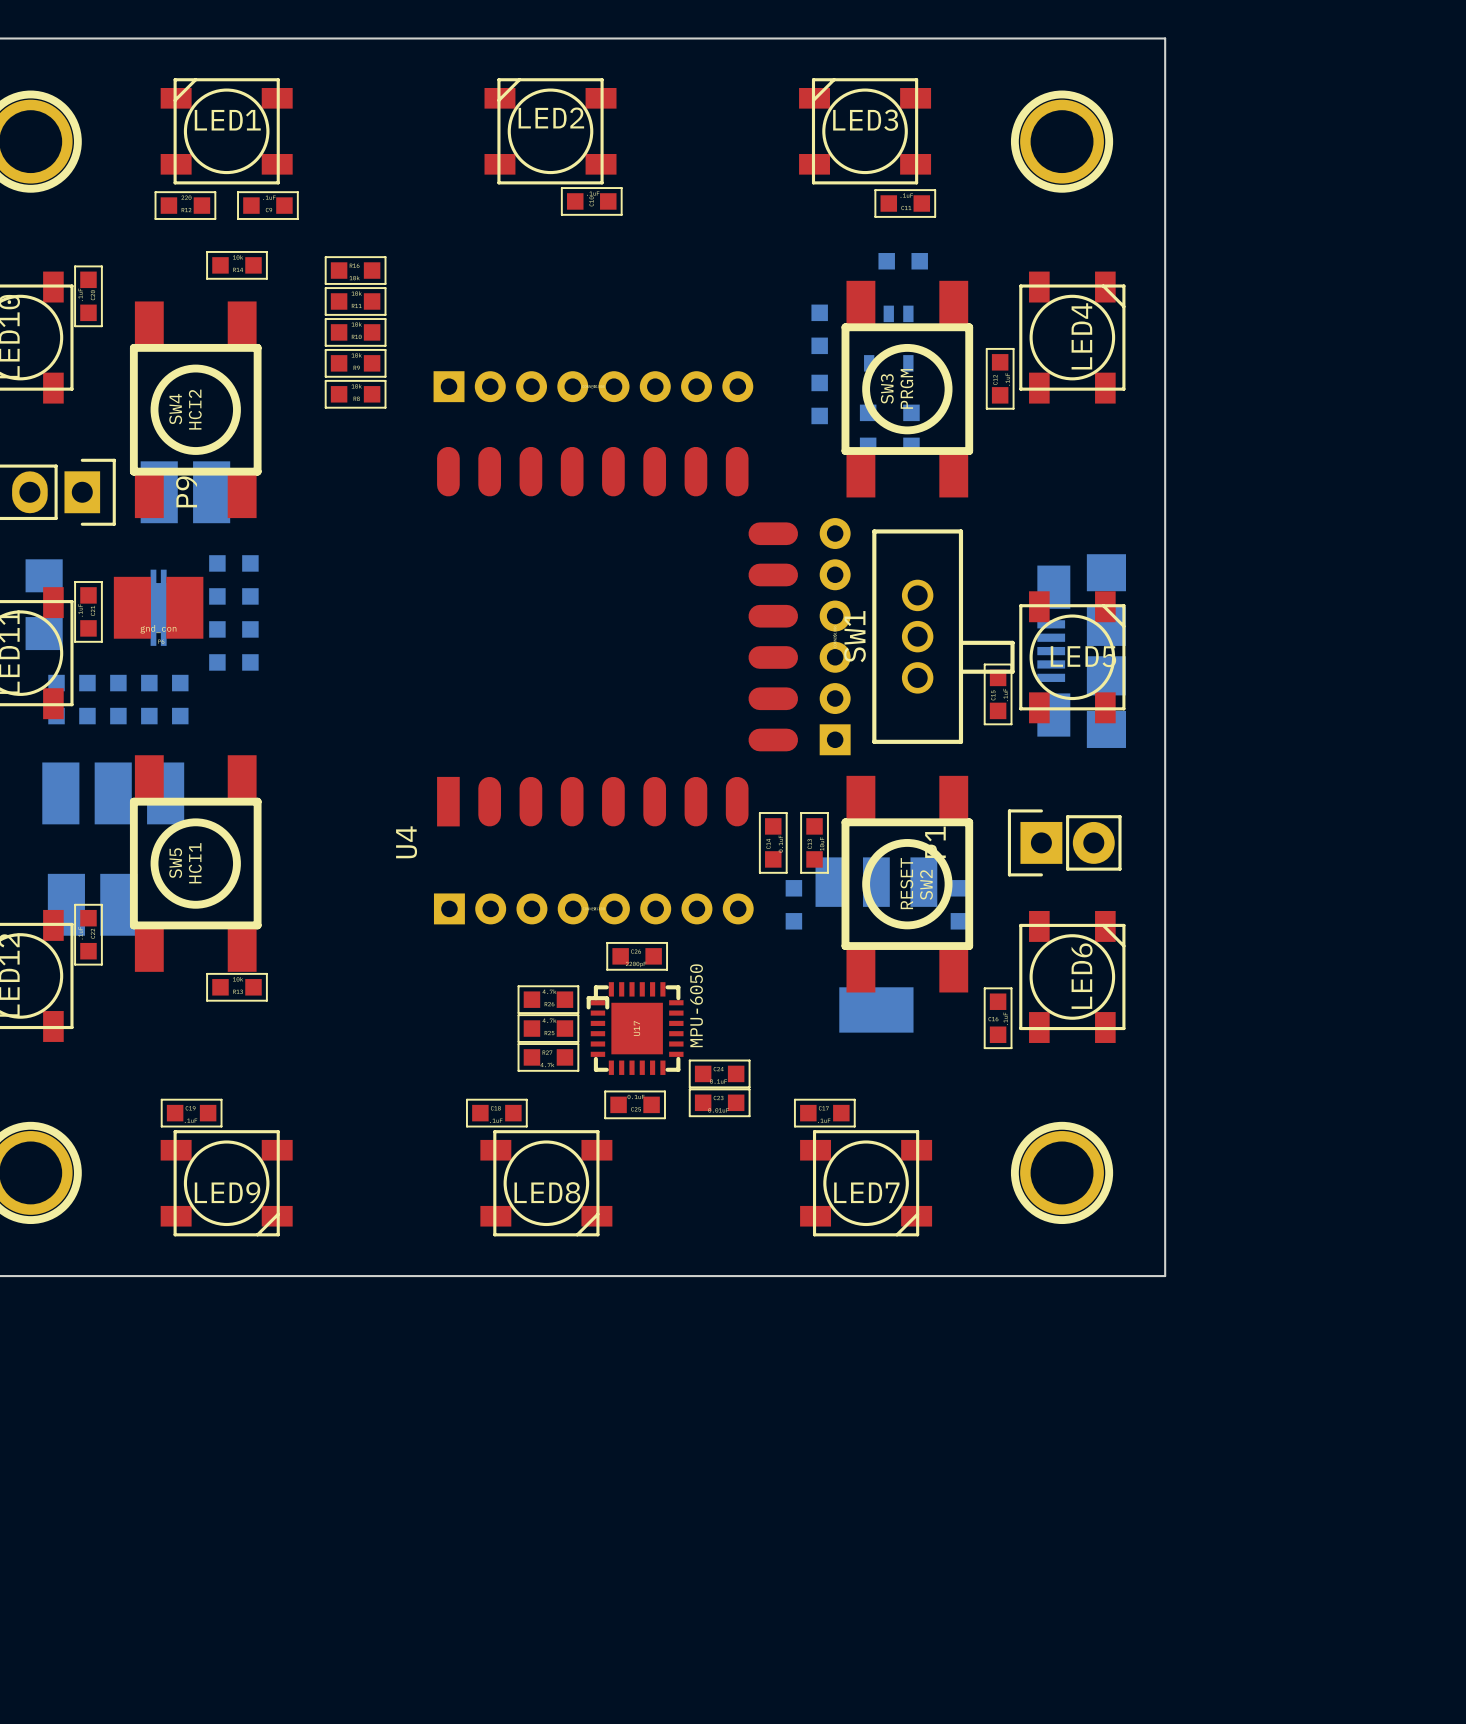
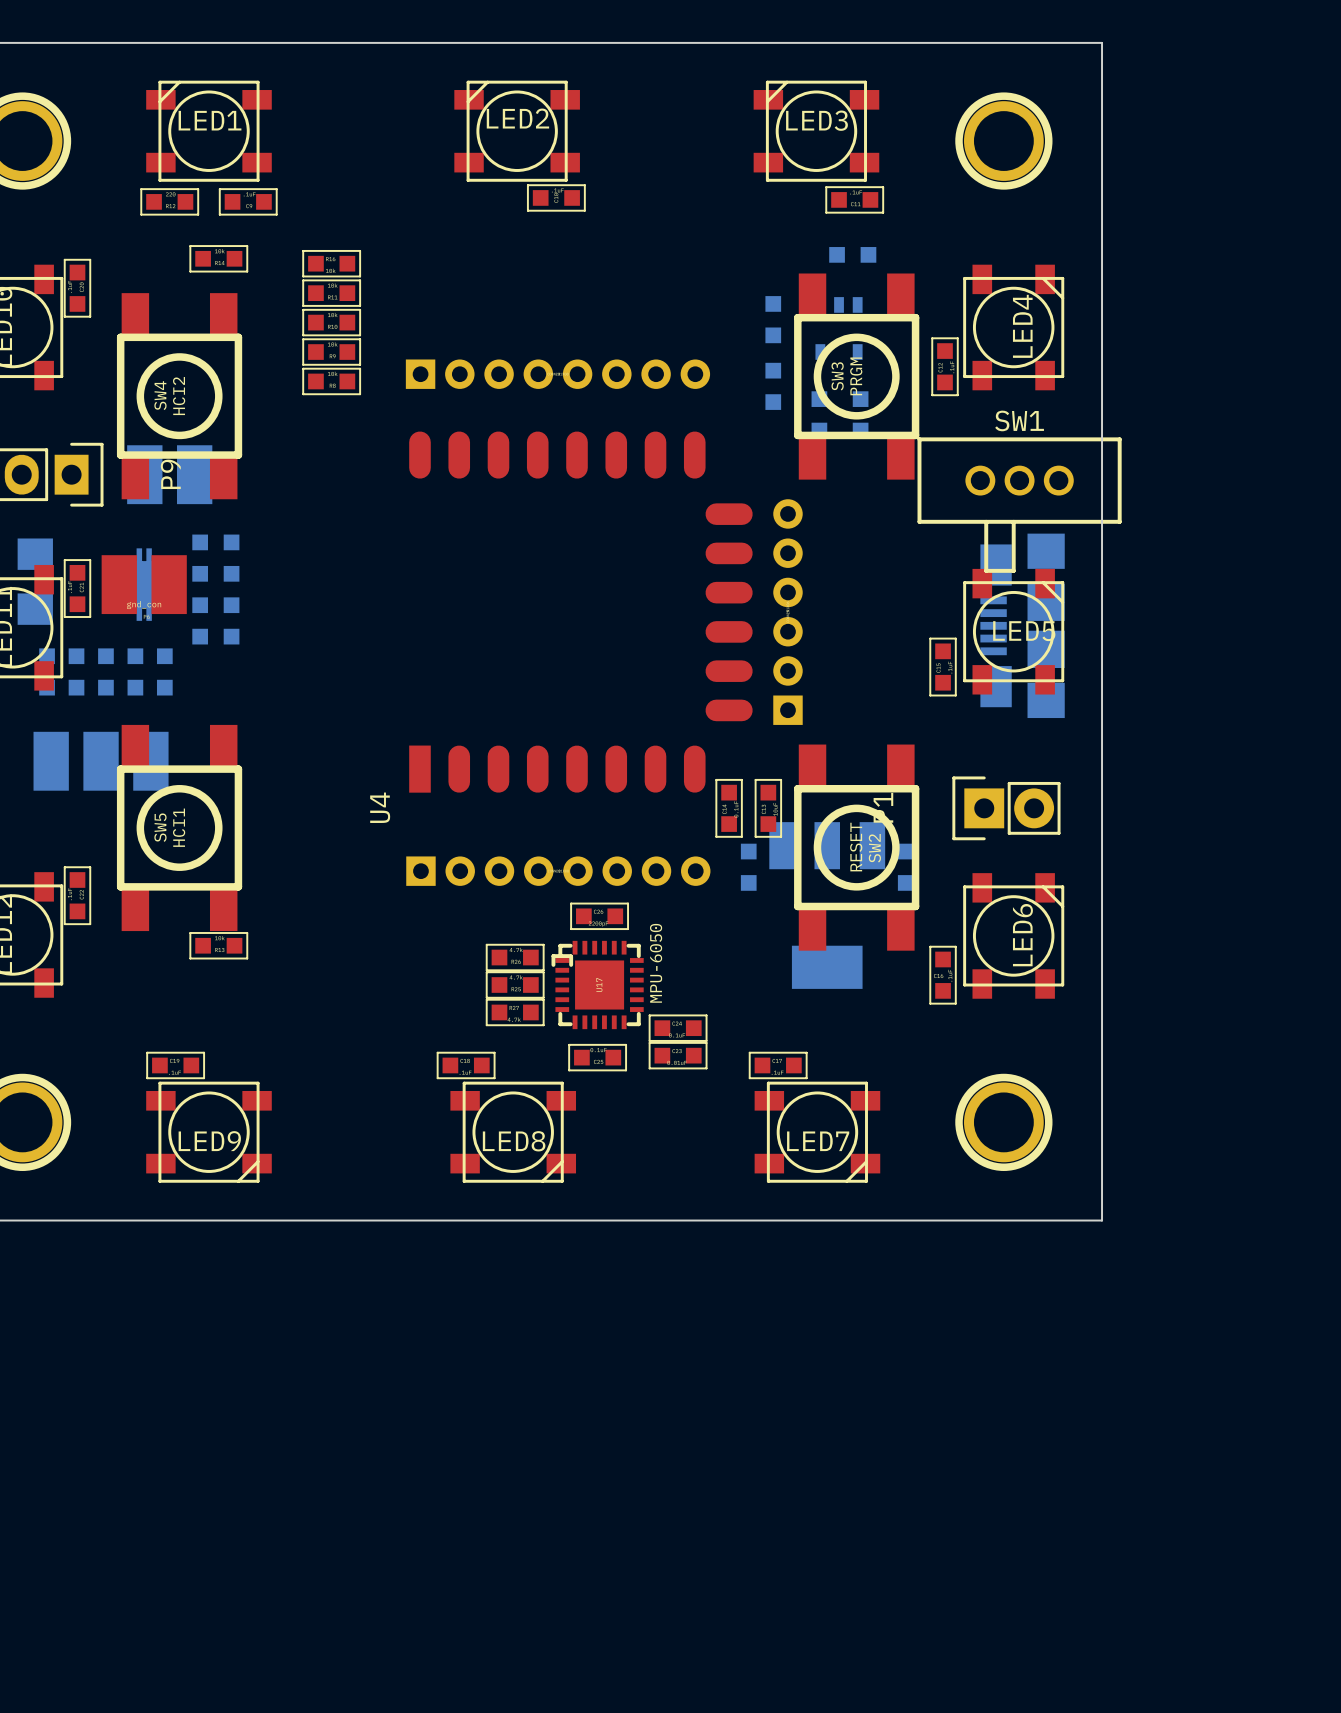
SW1 rotation: 0° (943, 636) -> 90° clockwise (1019, 505)
SW1 position: (943, 636) -> (1019, 505)
part: (92, 904) -> none

